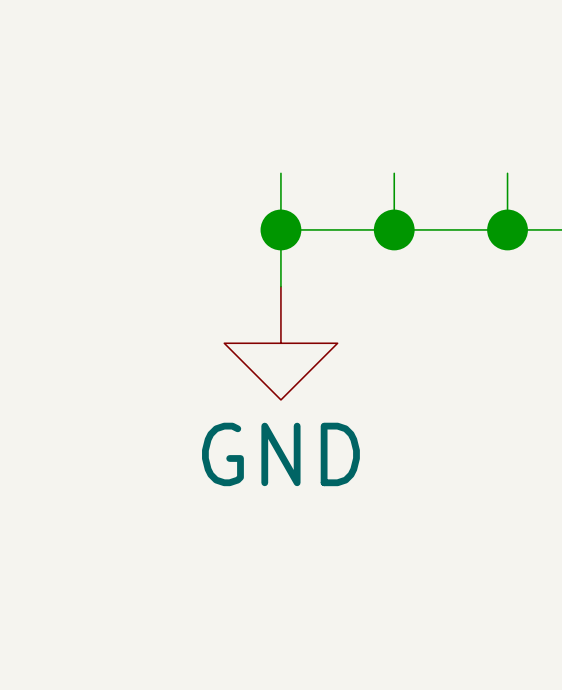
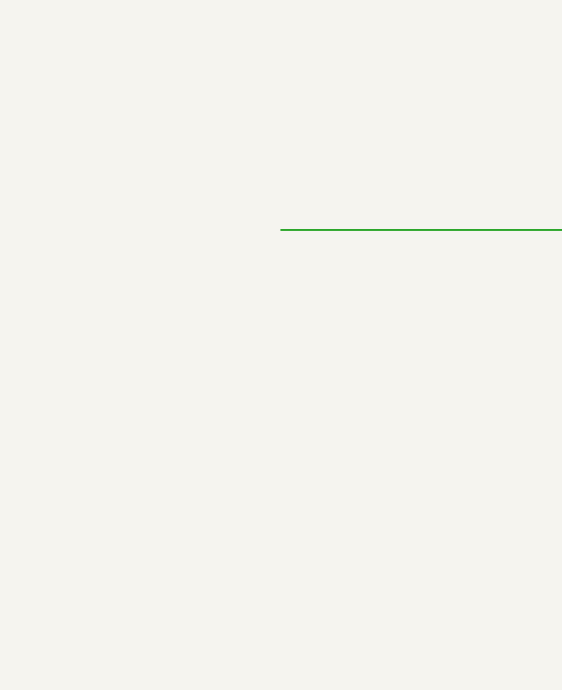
wire: (280, 173) (280, 286) -> none
wire: (394, 173) (394, 229) -> none
wire: (507, 173) (507, 229) -> none
junction: (280, 229) -> none
junction: (394, 229) -> none
junction: (507, 229) -> none
power symbol: GND (280, 343) -> none

